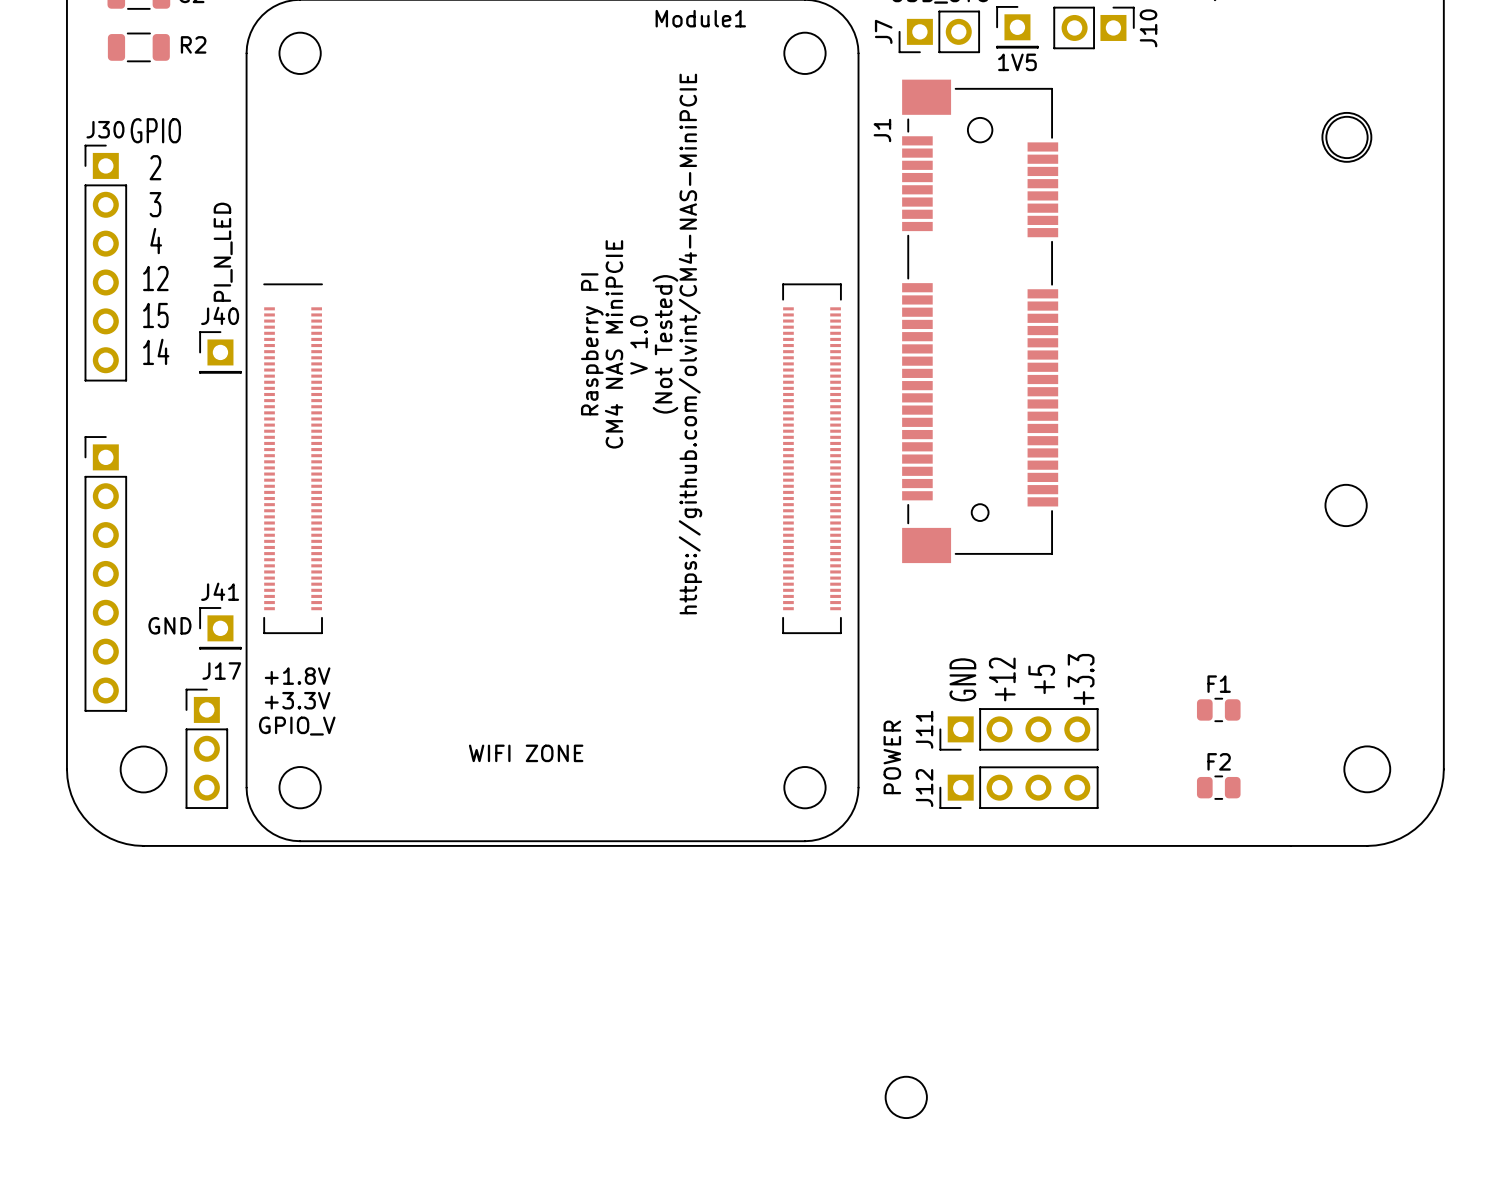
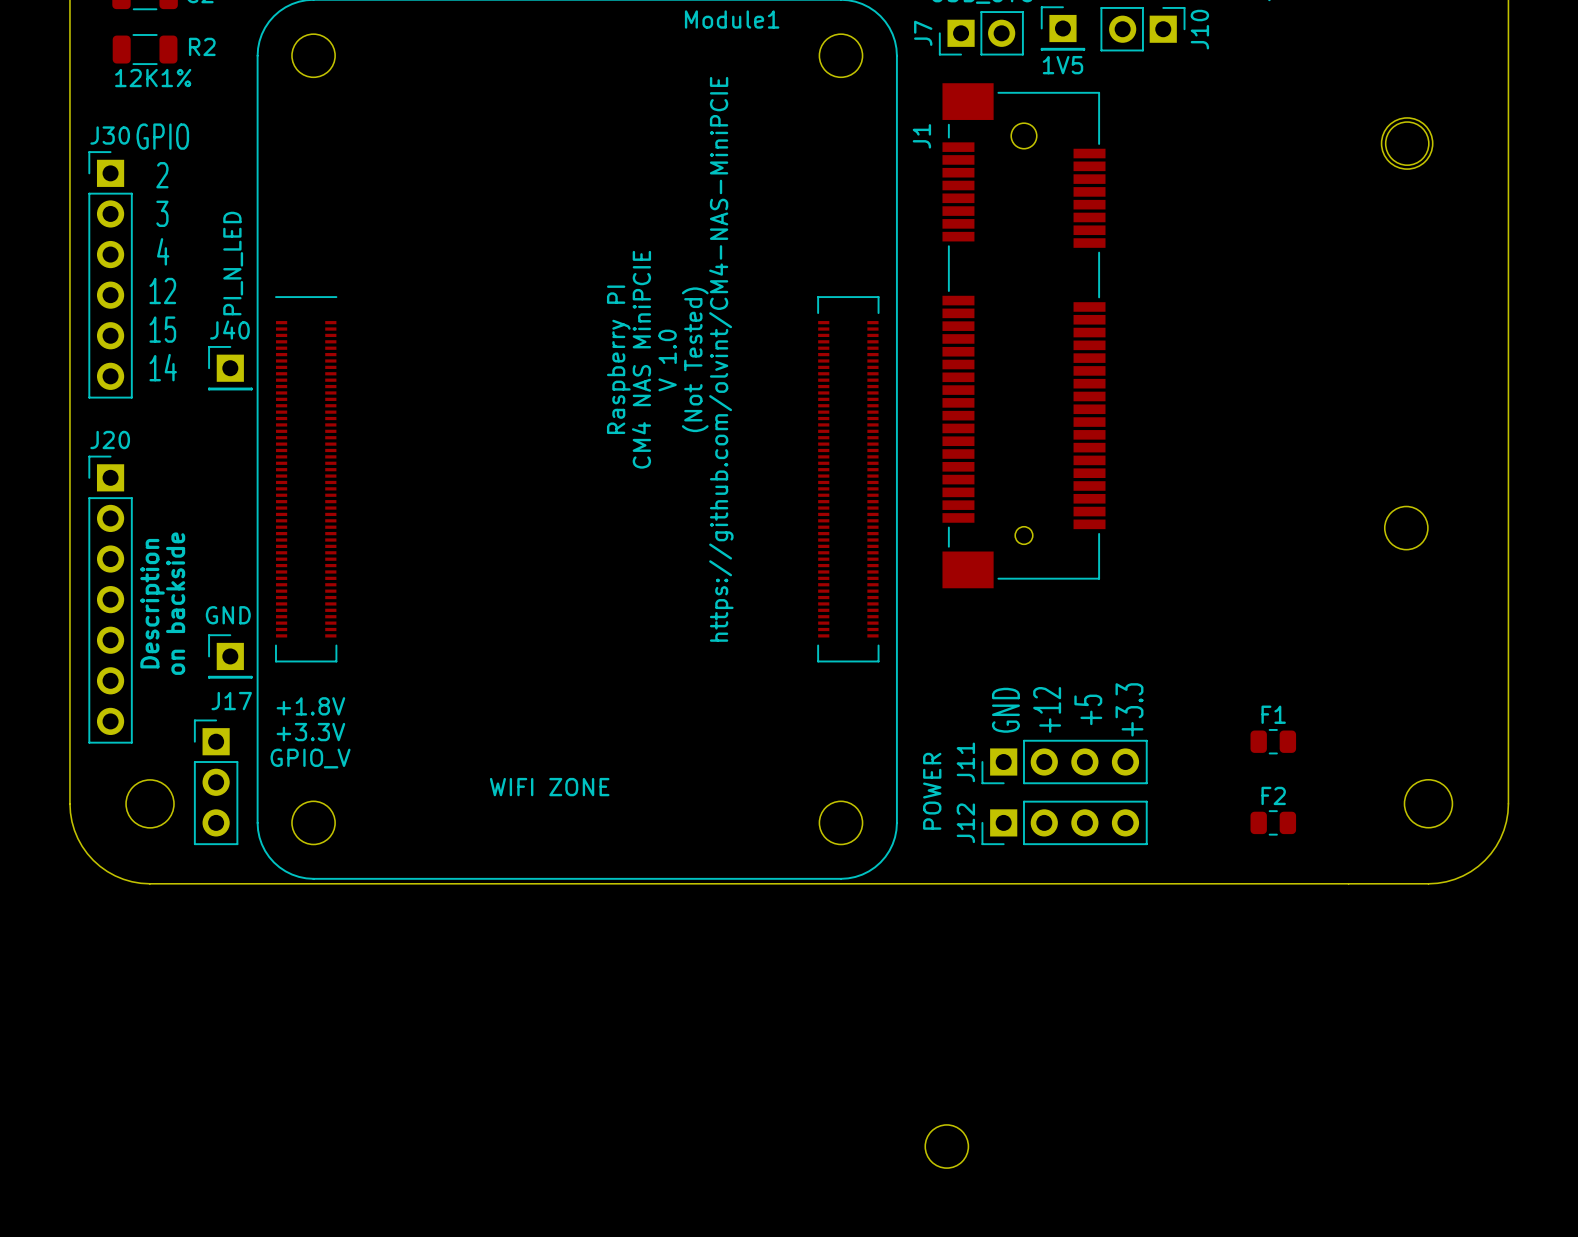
R2 value: none -> 12K1% (153, 78)
J20 name: none -> J20 (110, 439)
text: none -> Description (152, 603)
text: none -> on backside (175, 603)
J41 name: J41 (220, 591) -> none
text position: GND (169, 625) -> GND (228, 615)

